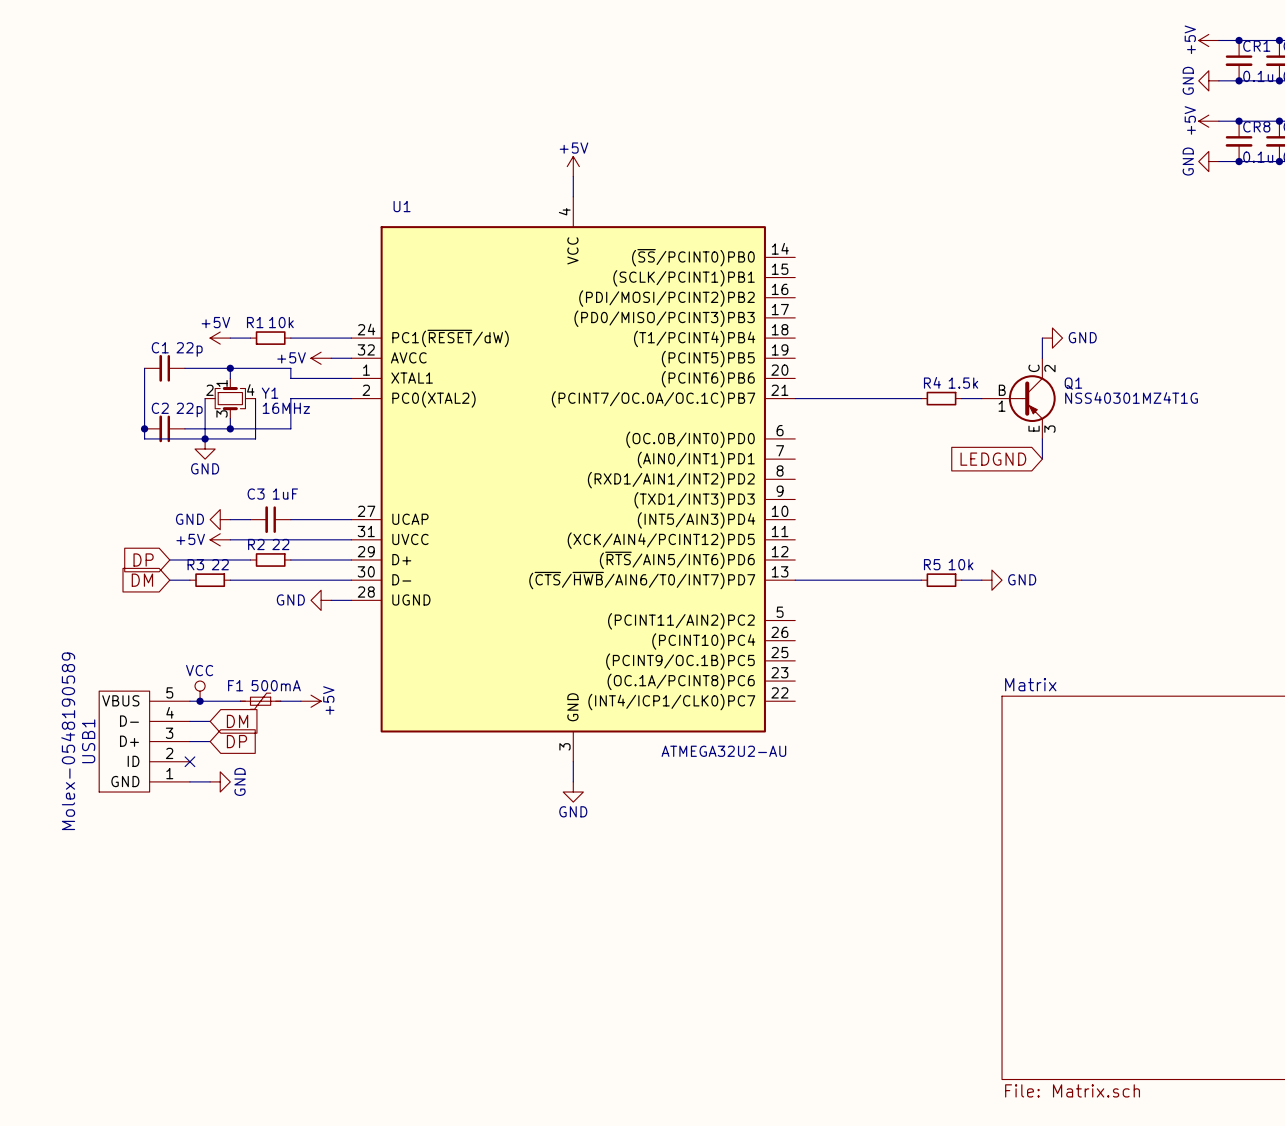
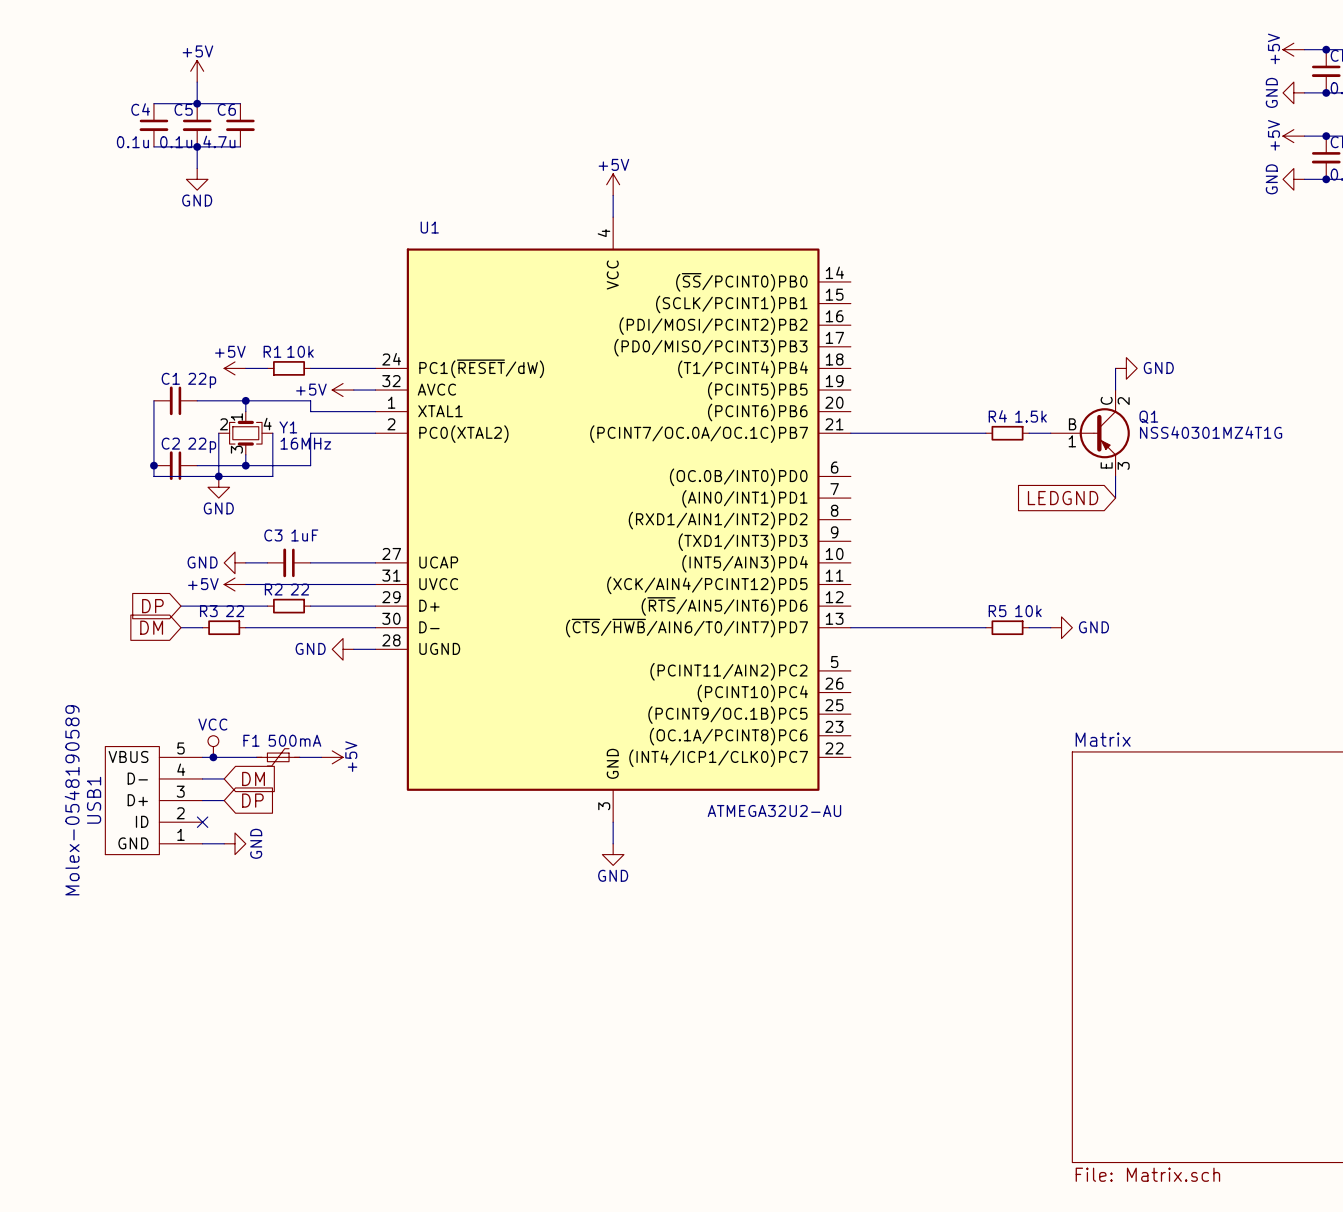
power symbol: none -> +5V (197, 71)
wire: none -> (197, 82) (197, 103)
wire: none -> (153, 103) (240, 103)
junction: none -> (197, 103)
C4: none -> 0.1u (153, 125)
C5: none -> 0.1u (197, 125)
C6: none -> 4.7u (240, 125)
wire: none -> (153, 146) (240, 146)
wire: none -> (197, 146) (197, 168)
junction: none -> (197, 146)
power symbol: none -> GND (197, 179)

